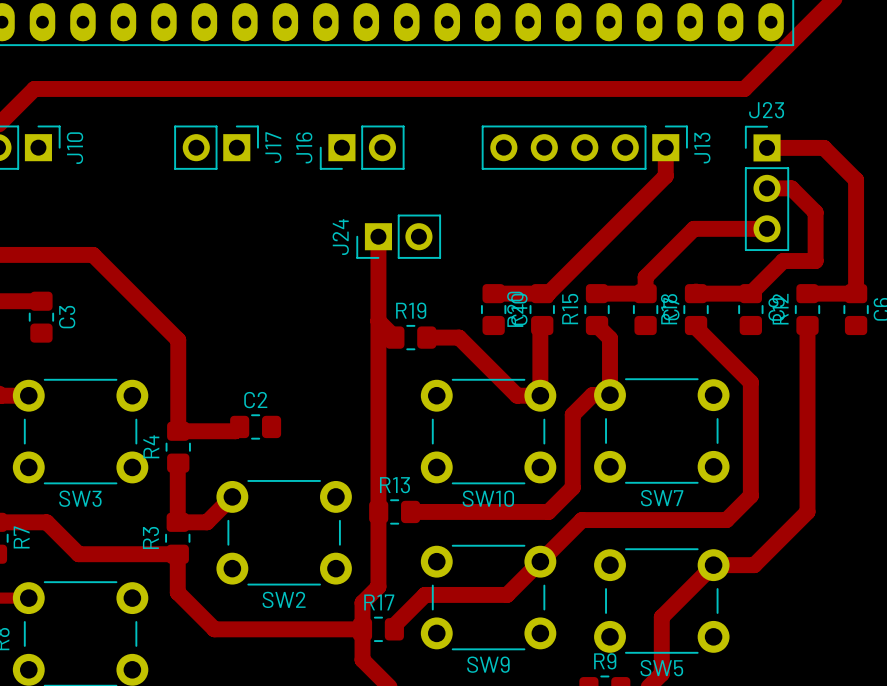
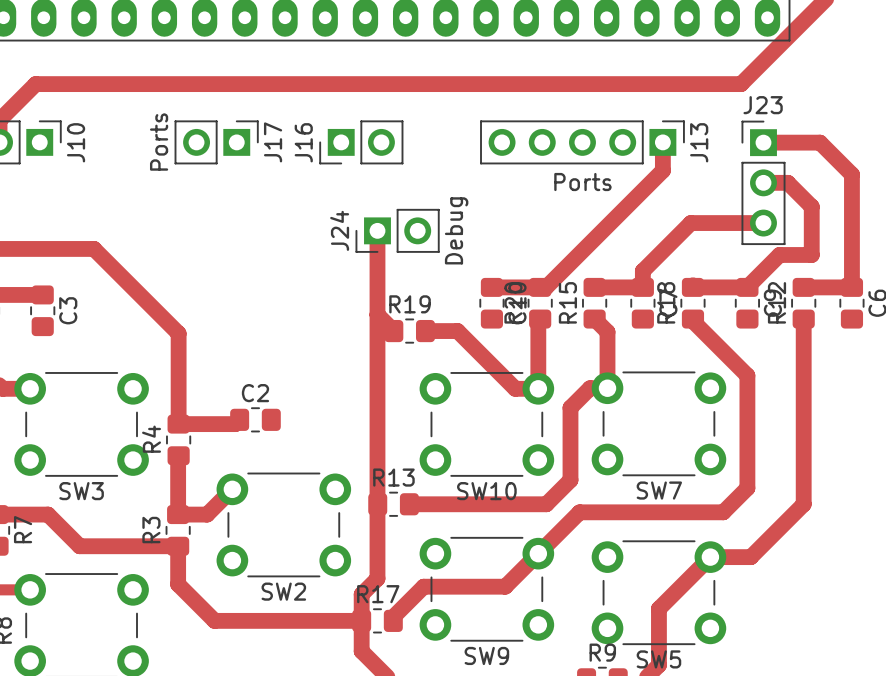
J17 value: none -> Ports (159, 142)
J13 value: none -> Ports (582, 182)
J24 value: none -> Debug (456, 230)

